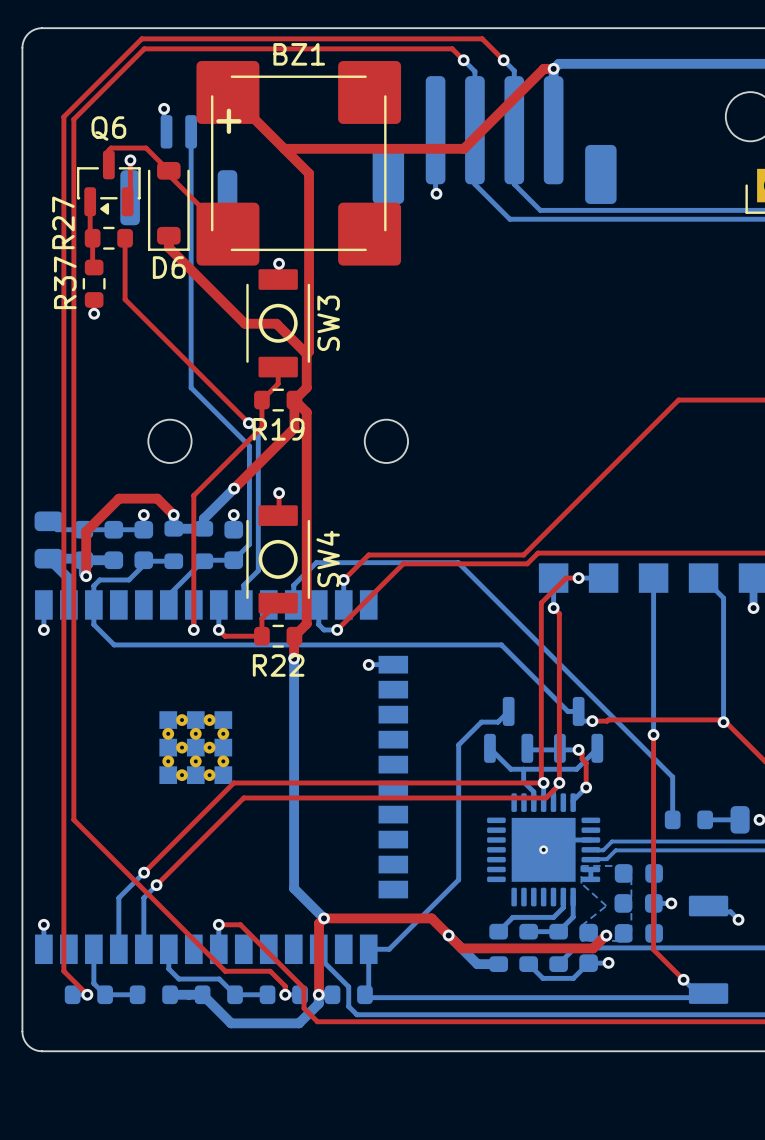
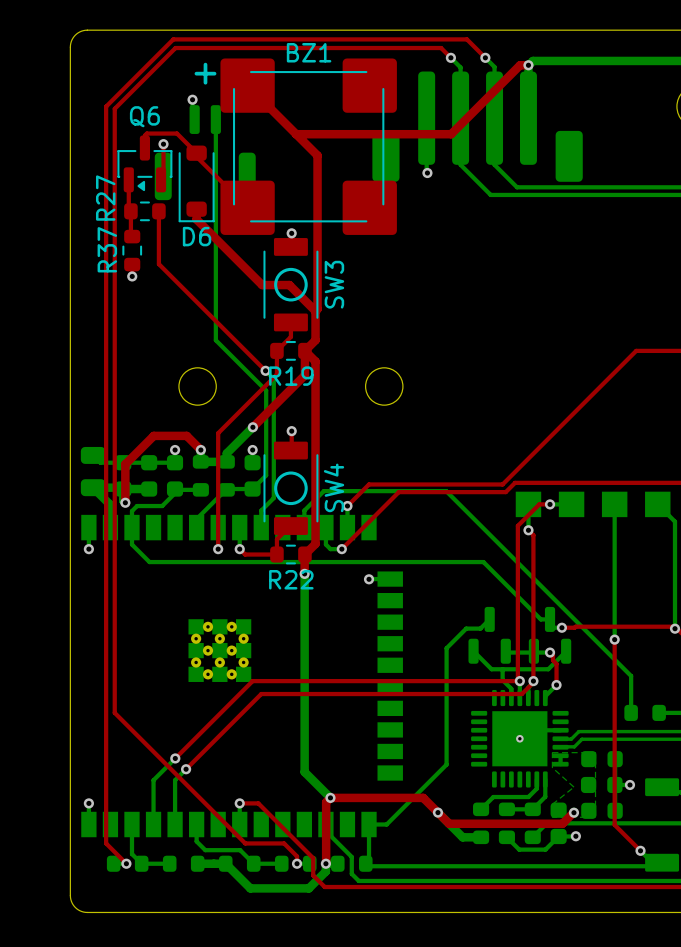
BZ1 text position: + (228, 121) -> + (205, 73)

